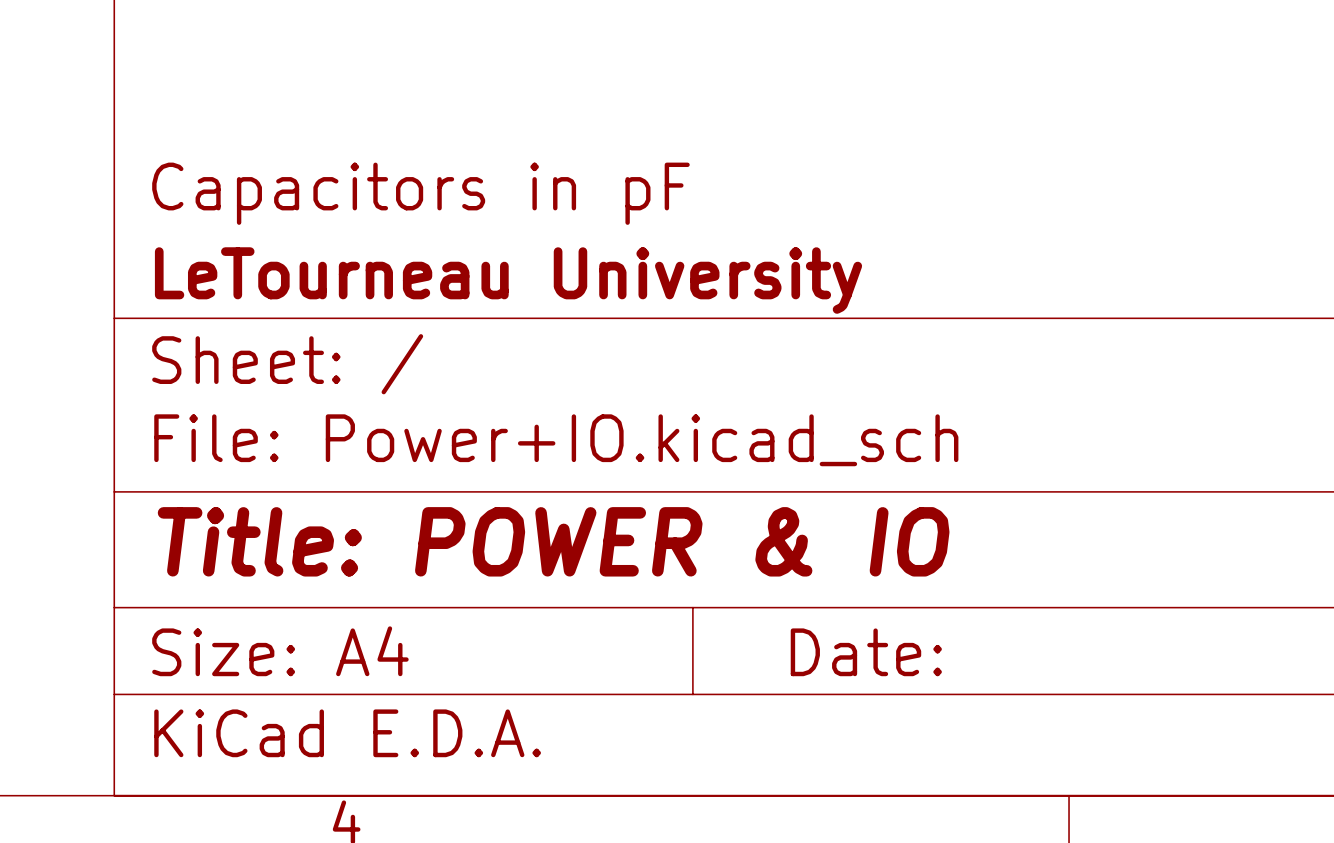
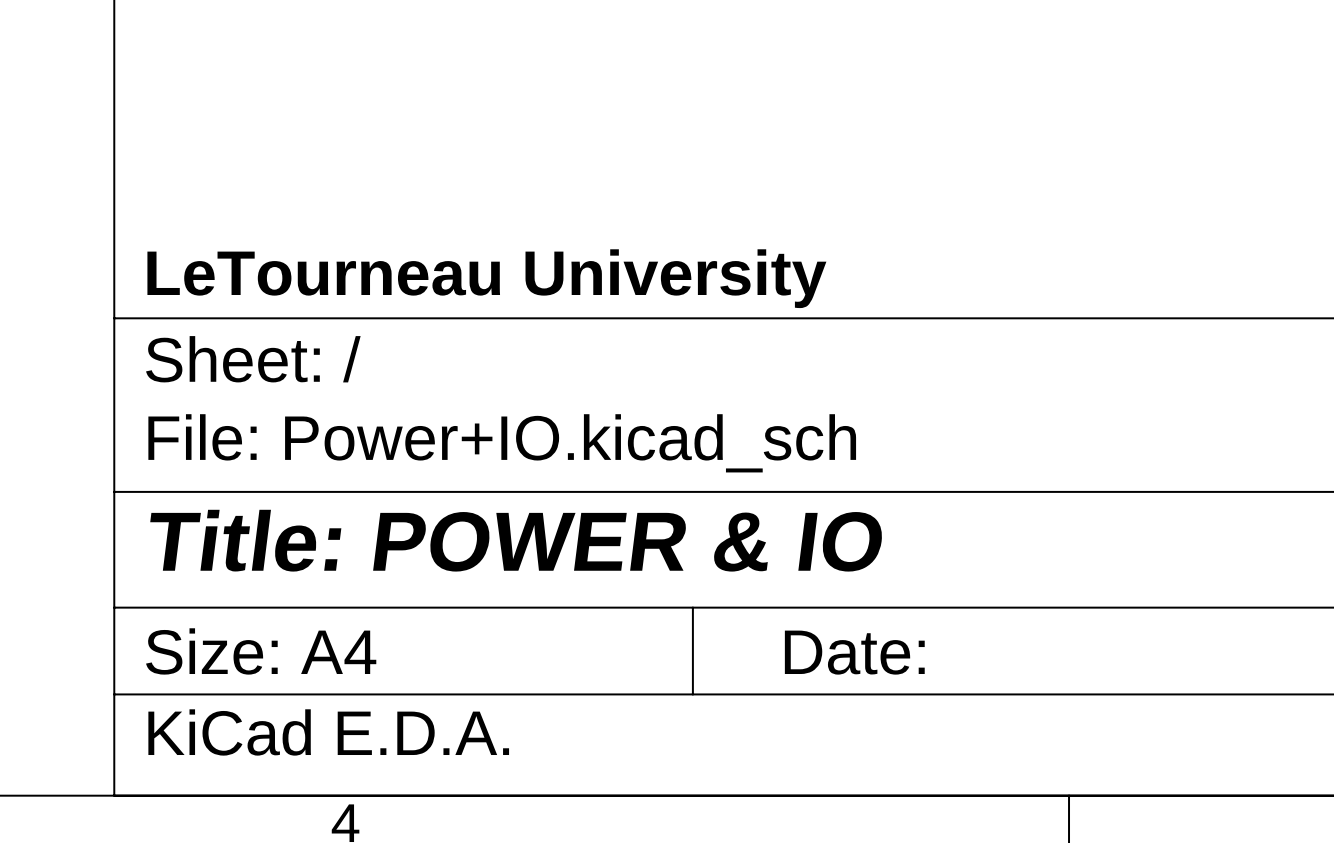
title block: Capacitors in pF (420, 193) -> none

